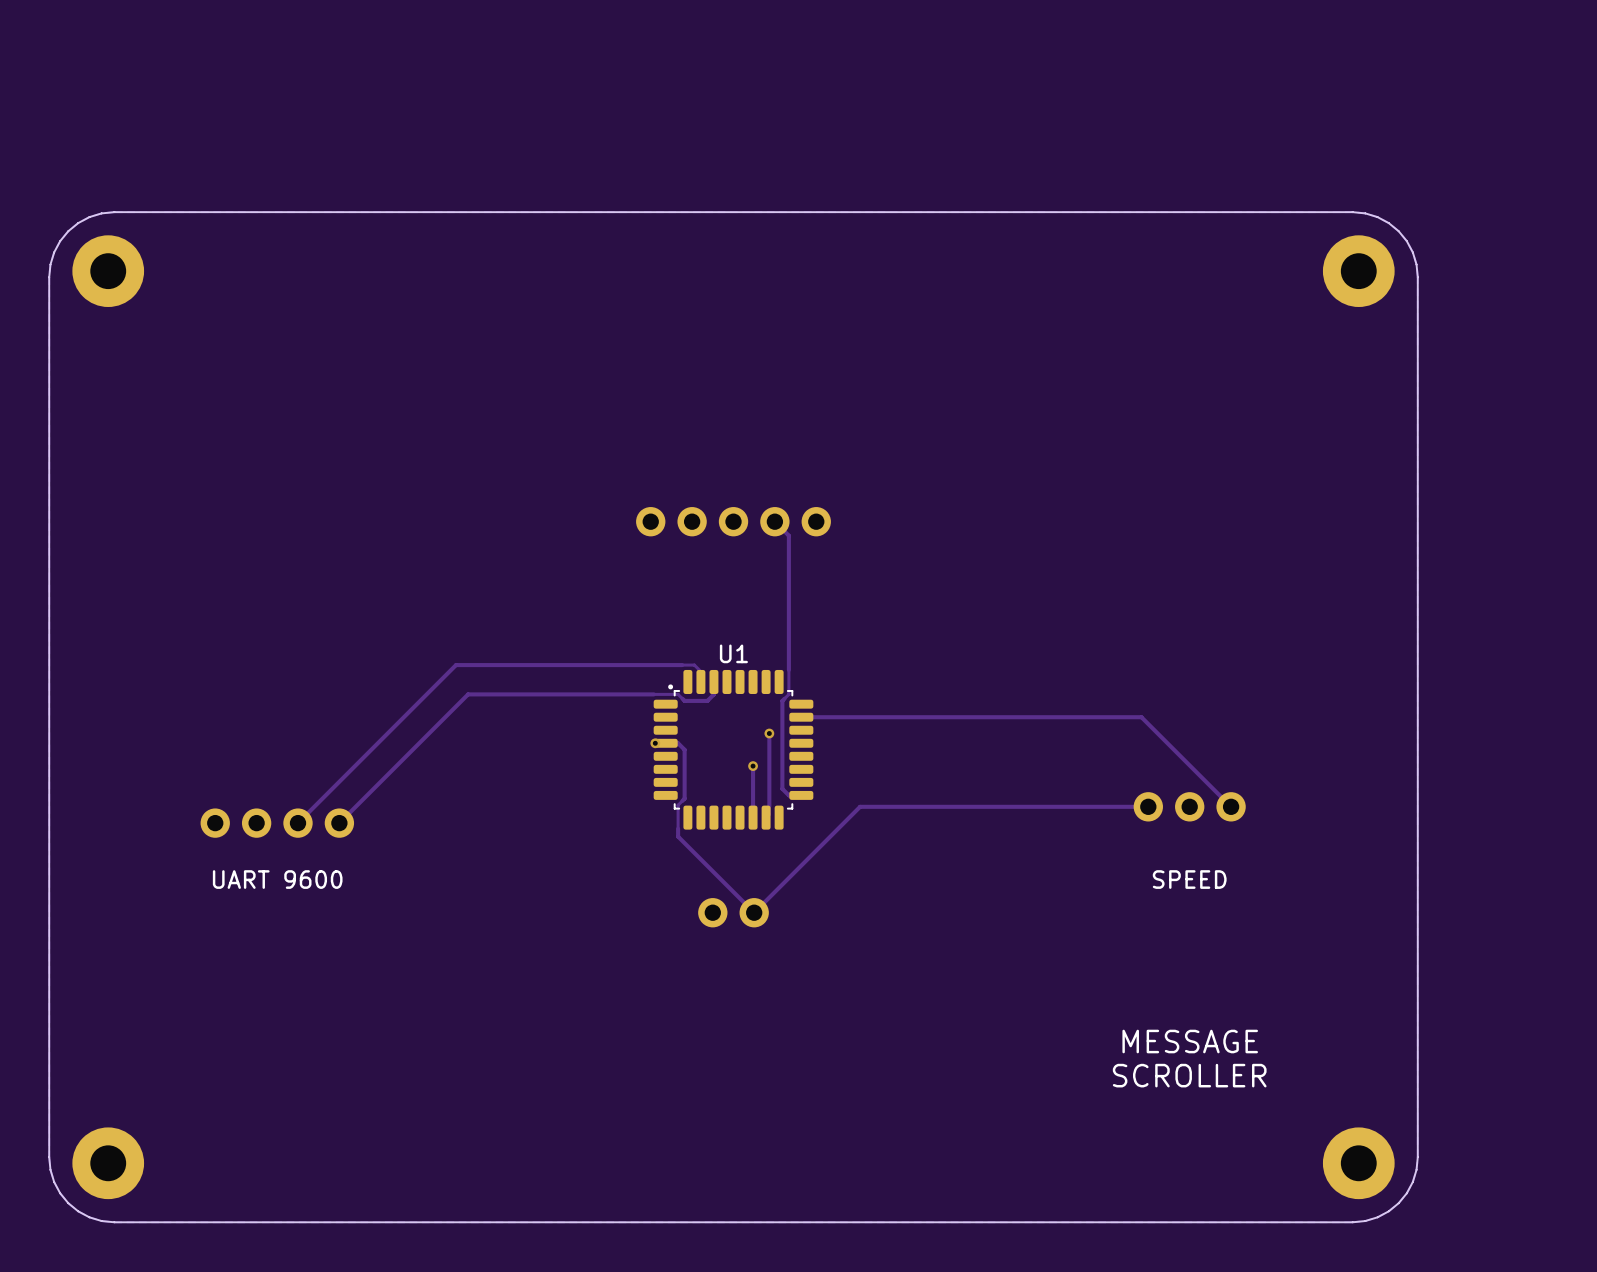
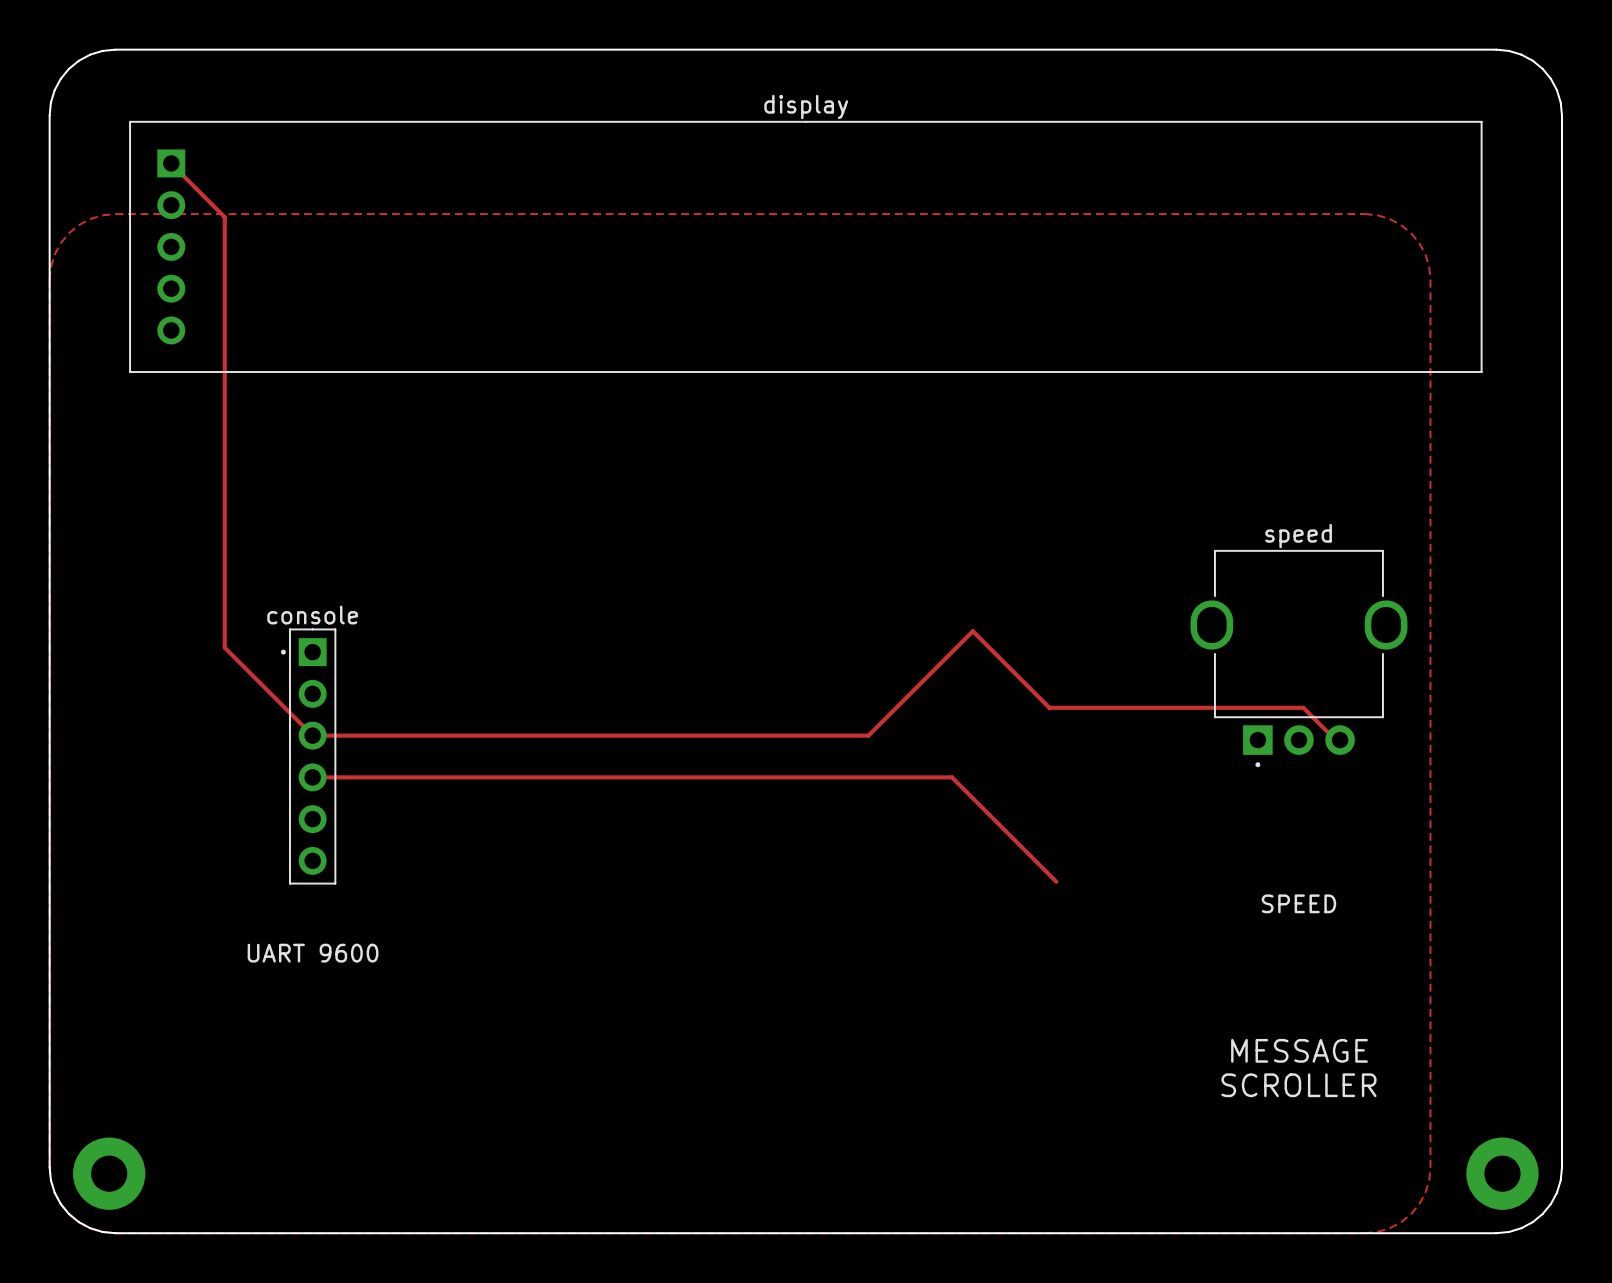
track: none -> (171, 163) (224, 217) (224, 647) (312, 735) (868, 735) (972, 631) (1049, 707) (1303, 707) (1335, 740) (1340, 740)
display: none -> (805, 246)
part: (108, 271) -> none
part: (1358, 271) -> none
board edge: (49, 277) (54, 252) (68, 231) (89, 217) (114, 212) (1352, 212) (1377, 217) (1388, 223) (1398, 231) (1412, 252) (1417, 277) (1417, 1157) (1412, 1182) (1398, 1203) (1377, 1217) (1352, 1222) -> (49, 279) (50, 102) (54, 90) (68, 68) (90, 54) (102, 50) (1496, 49) (1521, 54) (1532, 60) (1542, 68) (1556, 90) (1561, 115) (1560, 1180) (1556, 1192) (1542, 1213) (1521, 1228) (1509, 1231) (1364, 1233)
part: (733, 521) -> none
track: (774, 521) (788, 535) (788, 694) (782, 700) (782, 788) (788, 795) (801, 795) -> none
speed: none -> (1298, 658)
track: (700, 681) (700, 671) (694, 665) (456, 665) (298, 823) -> none
track: (713, 681) (713, 694) (707, 700) (684, 700) (678, 694) (468, 694) (339, 823) -> none
track: (801, 717) (1141, 717) (1231, 806) -> none
track: (769, 733) (769, 814) (766, 817) -> none
via: (769, 733) -> none
via: (655, 743) -> none
track: (665, 743) (678, 743) (684, 749) (684, 798) (678, 805) (678, 836) (754, 912) (860, 806) (1148, 806) -> none
console: none -> (308, 756)
U1: (733, 749) -> none
track: (753, 766) (753, 817) -> none
via: (753, 766) -> none
track: none -> (312, 777) (951, 777) (1056, 881)
part: (1189, 806) -> none
part: (277, 823) -> none
text position: UART 9600 (277, 879) -> UART 9600 (313, 953)
text position: SPEED (1189, 879) -> SPEED (1298, 903)
part: (733, 912) -> none
text position: MESSAGE (1190, 1041) -> MESSAGE (1299, 1050)
text position: SCROLLER (1189, 1075) -> SCROLLER (1298, 1085)
part position: (1358, 1163) -> (1502, 1173)

